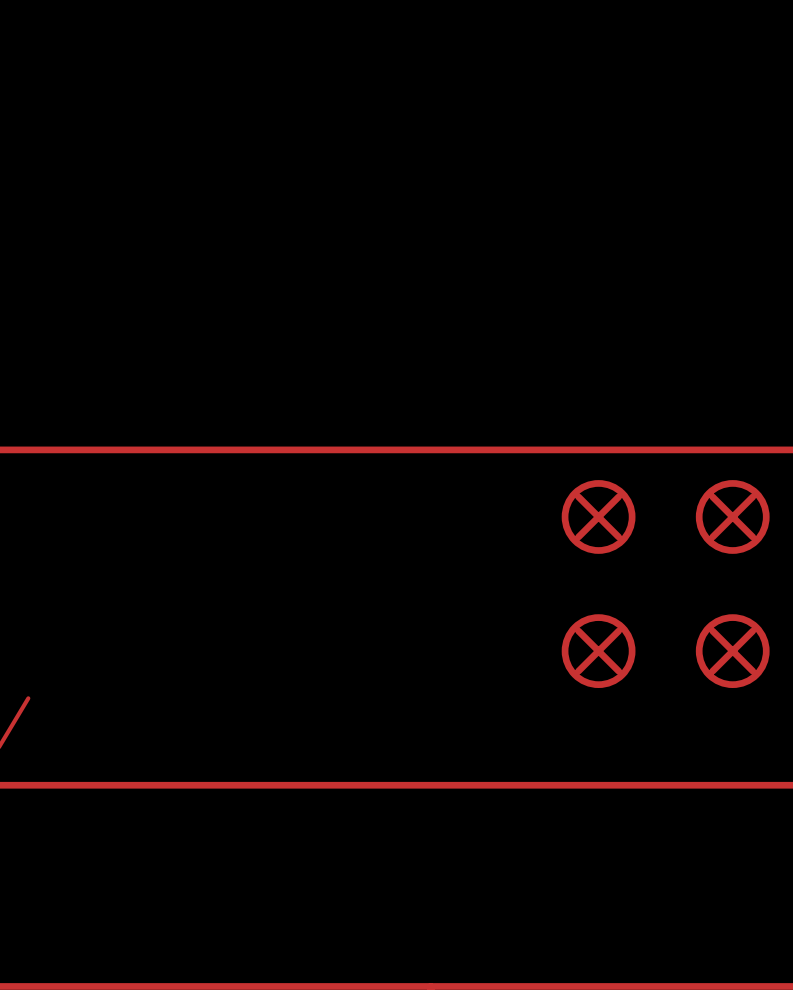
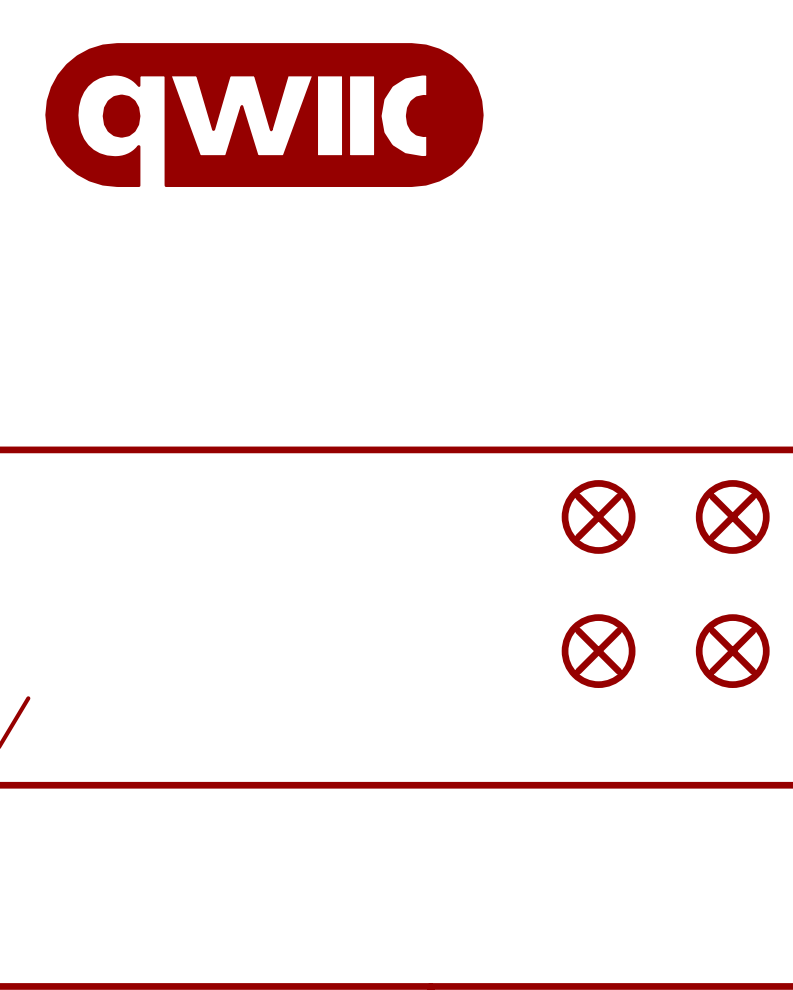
part: none -> (264, 115)

